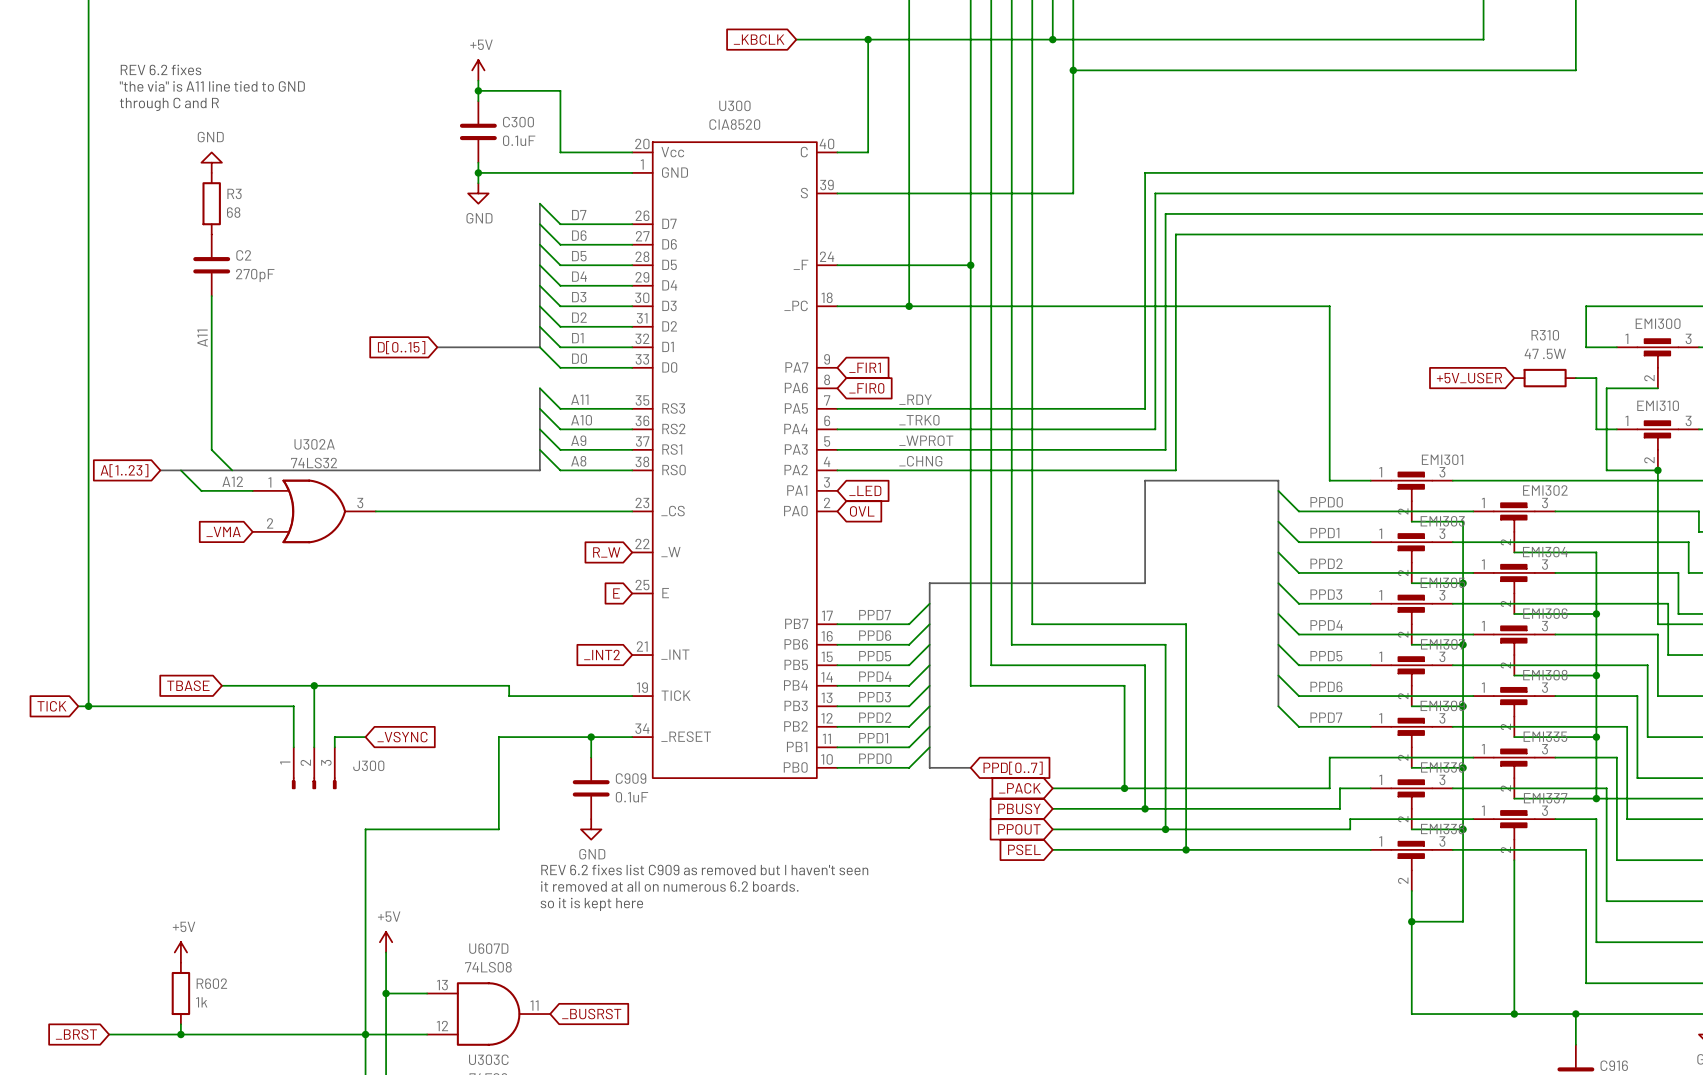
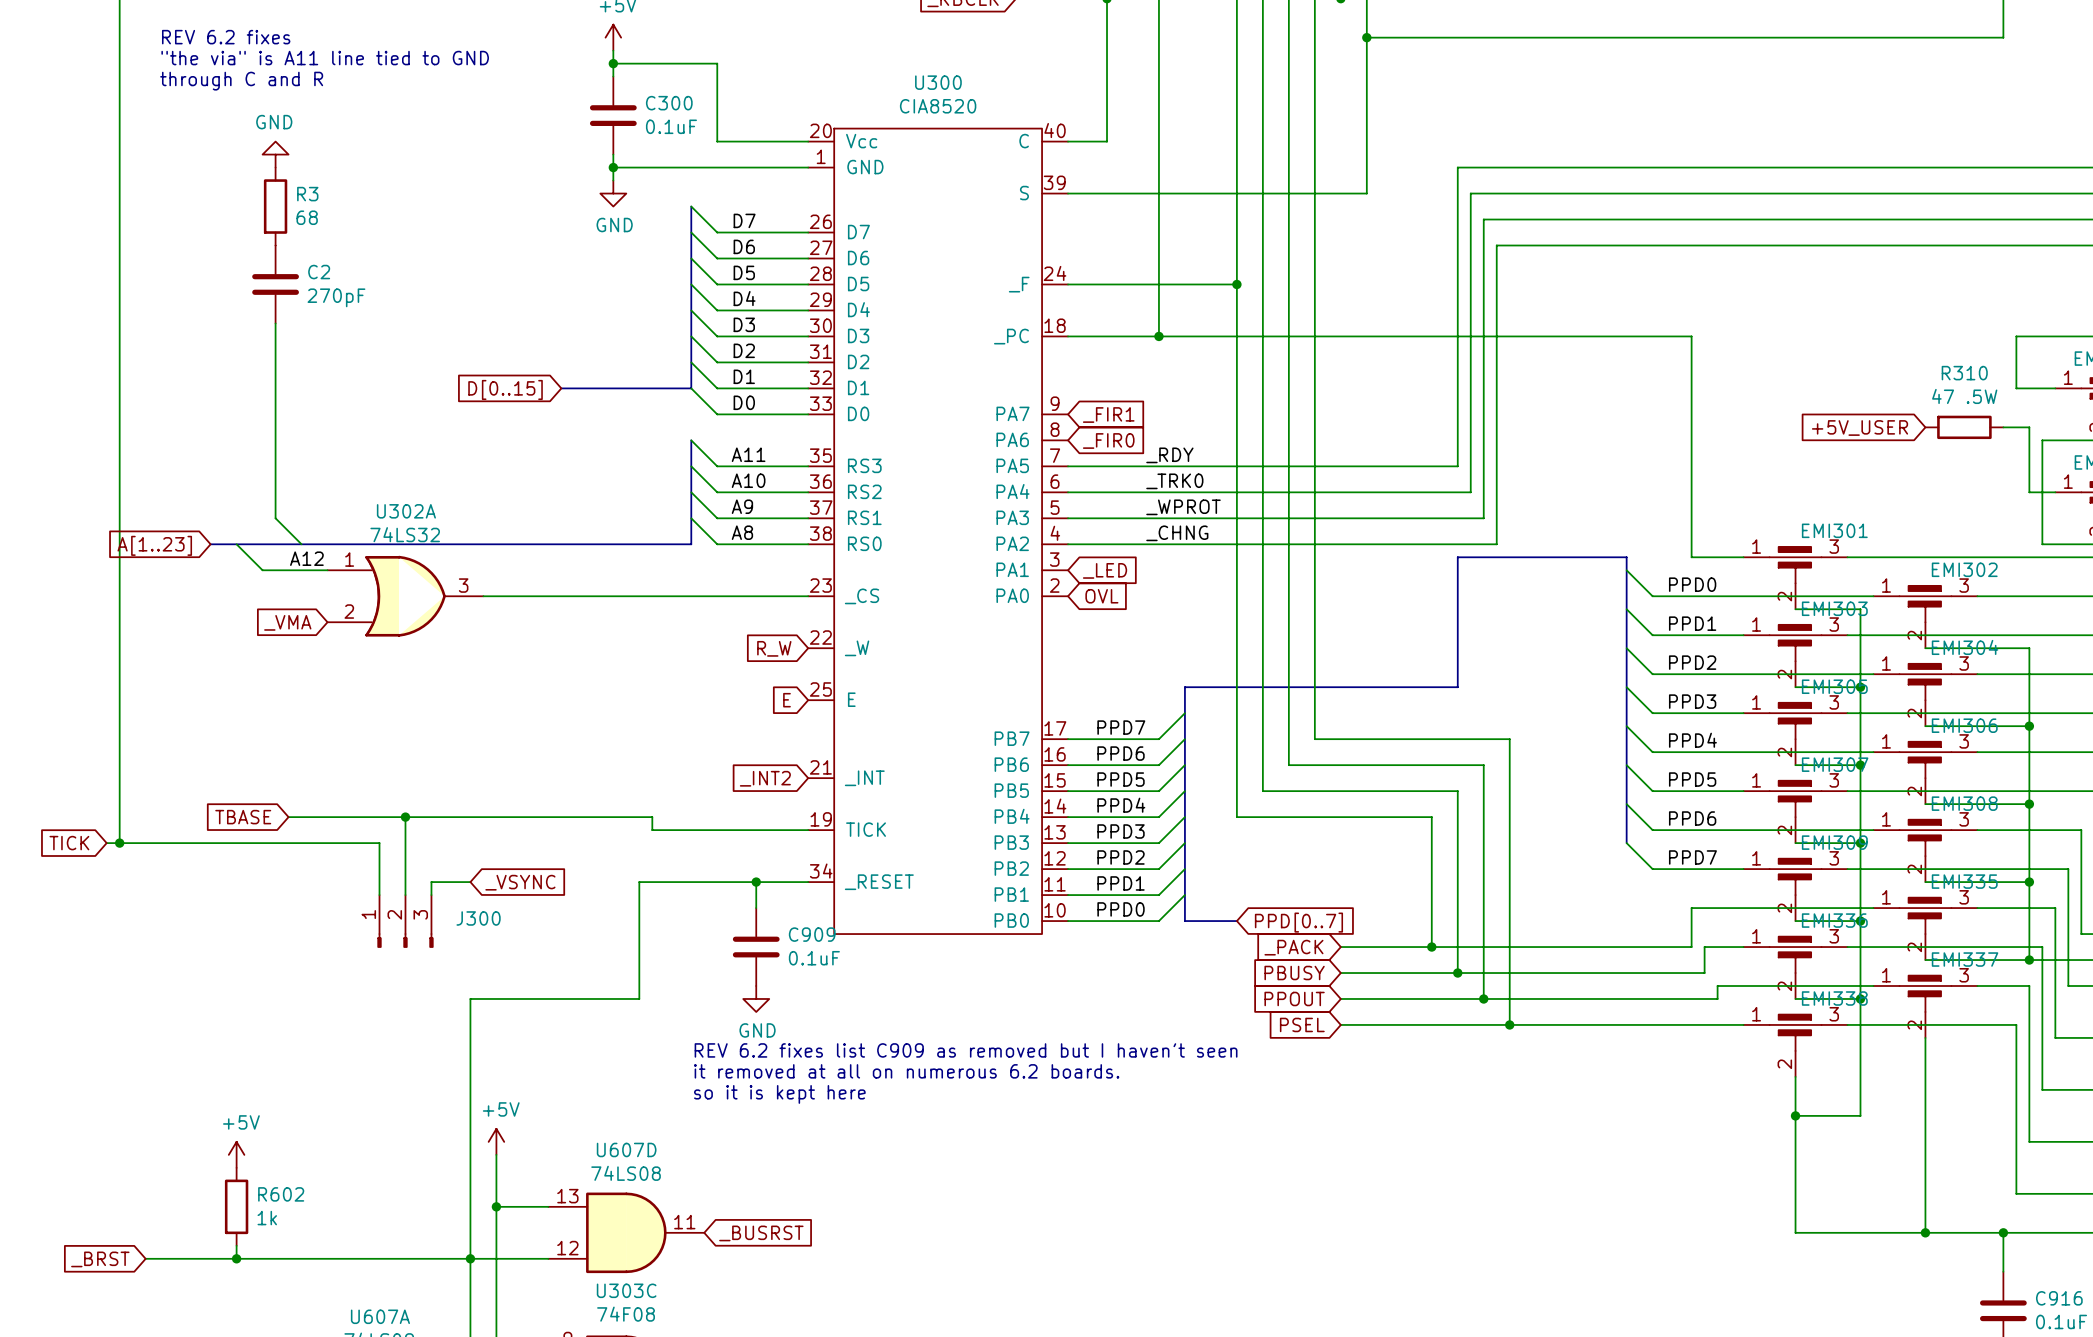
label: A11 (202, 338) -> none

